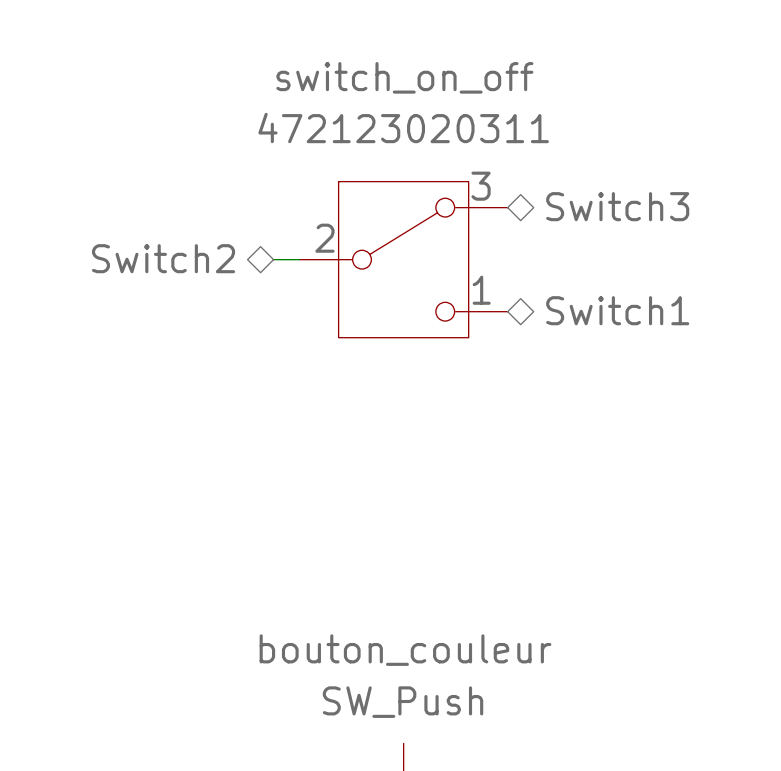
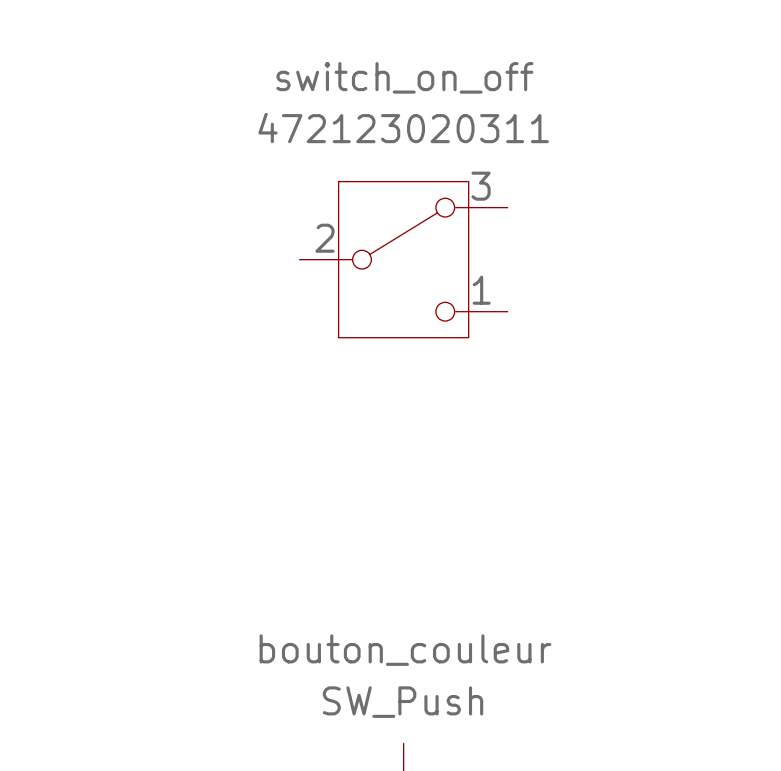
hierarchical label: Switch3 (617, 206) -> none
hierarchical label: Switch2 (163, 258) -> none
wire: (273, 259) (299, 259) -> none
hierarchical label: Switch1 (617, 310) -> none

